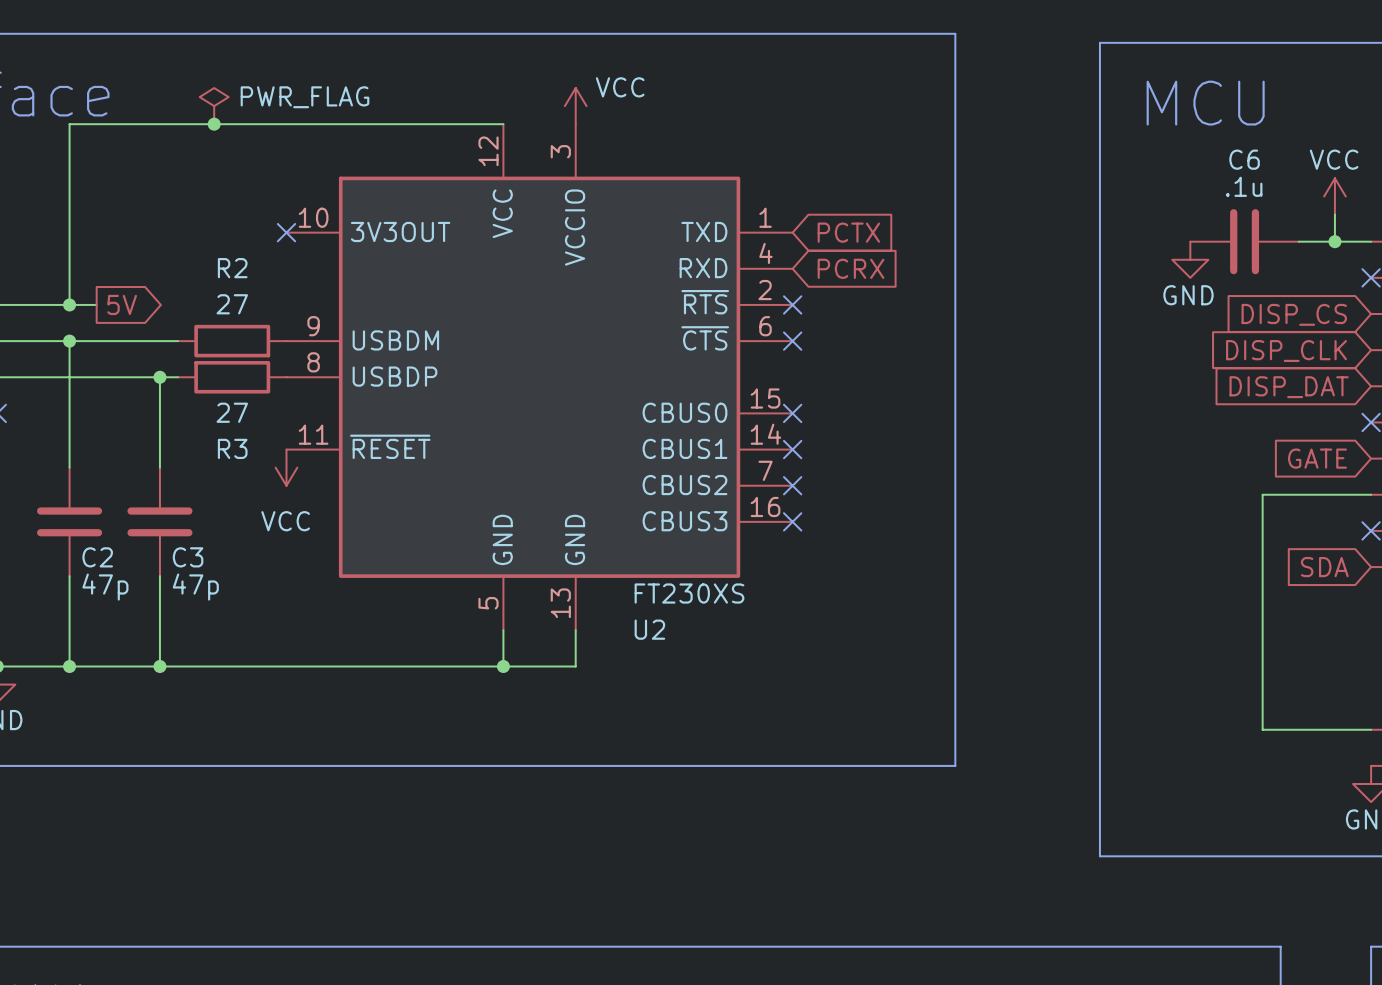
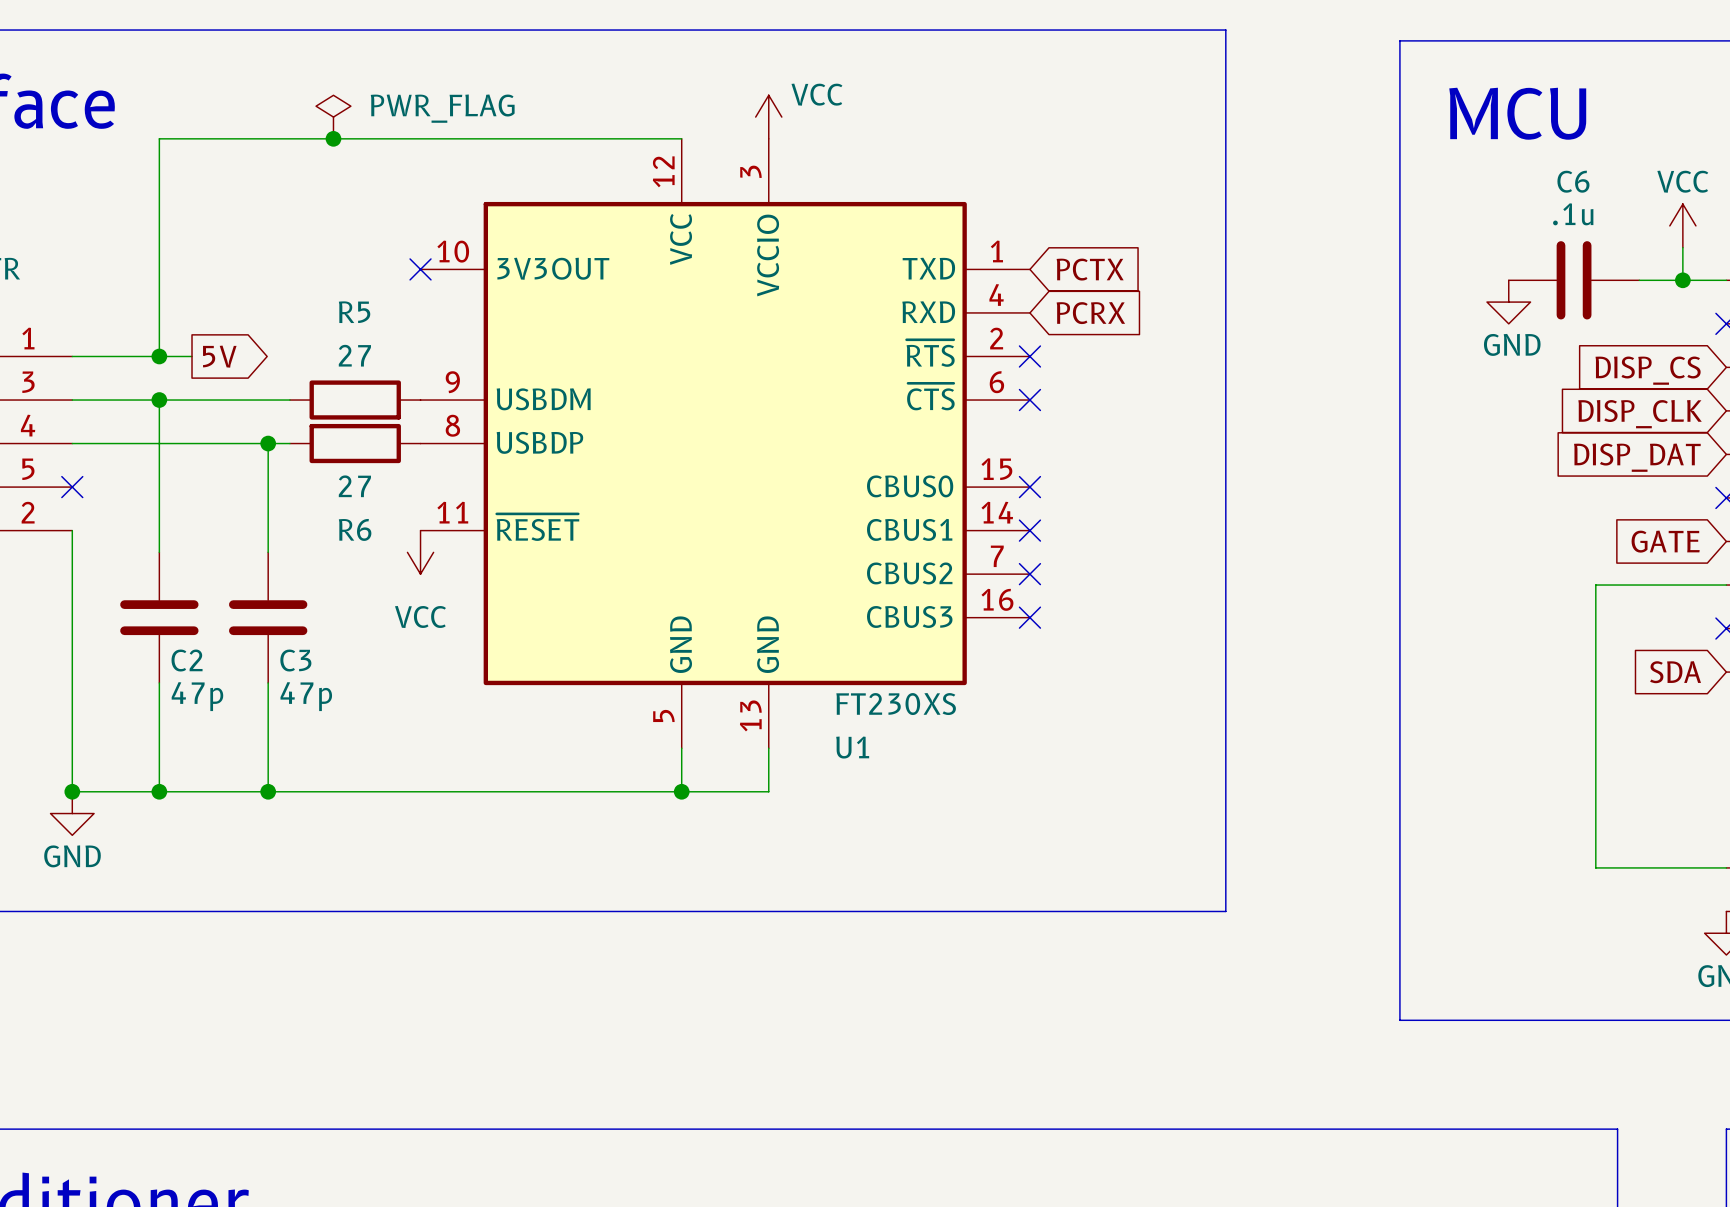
R2 name: R2 (232, 268) -> R5 (354, 312)
R3 name: R3 (232, 448) -> R6 (355, 529)
U2 name: U2 (649, 629) -> U1 (852, 747)

